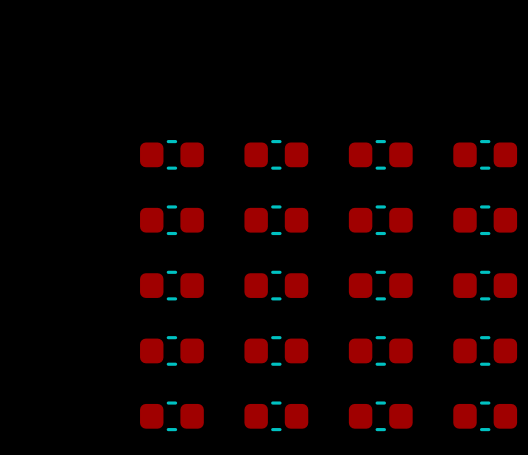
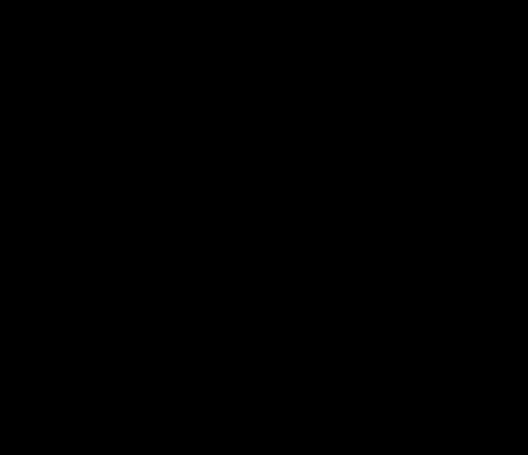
part: (171, 154) -> none
part: (276, 154) -> none
part: (380, 154) -> none
part: (485, 154) -> none
part: (171, 220) -> none
part: (276, 220) -> none
part: (380, 220) -> none
part: (485, 220) -> none
part: (171, 285) -> none
part: (276, 285) -> none
part: (380, 285) -> none
part: (485, 285) -> none
part: (171, 350) -> none
part: (276, 350) -> none
part: (380, 350) -> none
part: (485, 350) -> none
part: (171, 416) -> none
part: (276, 416) -> none
part: (380, 416) -> none
part: (485, 416) -> none

